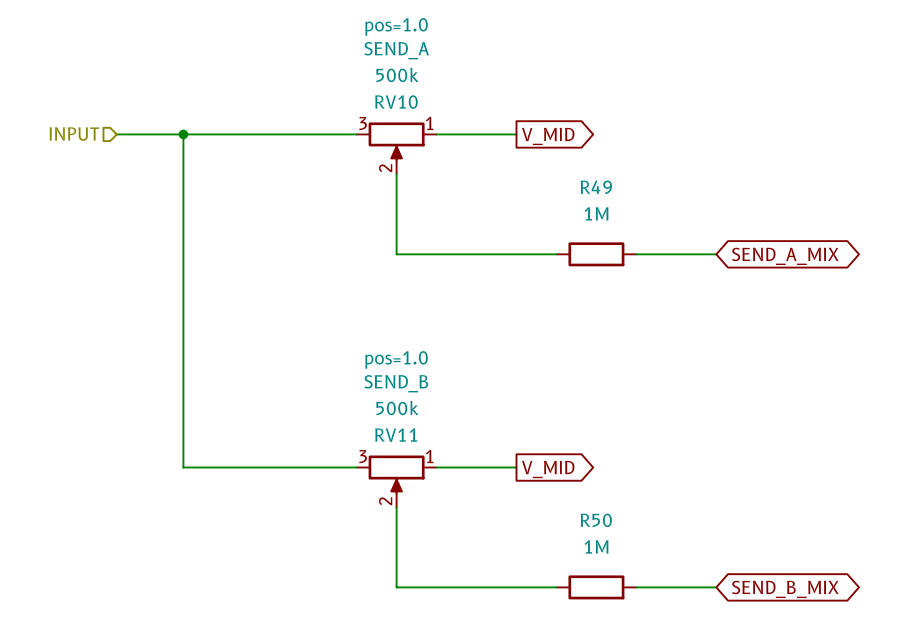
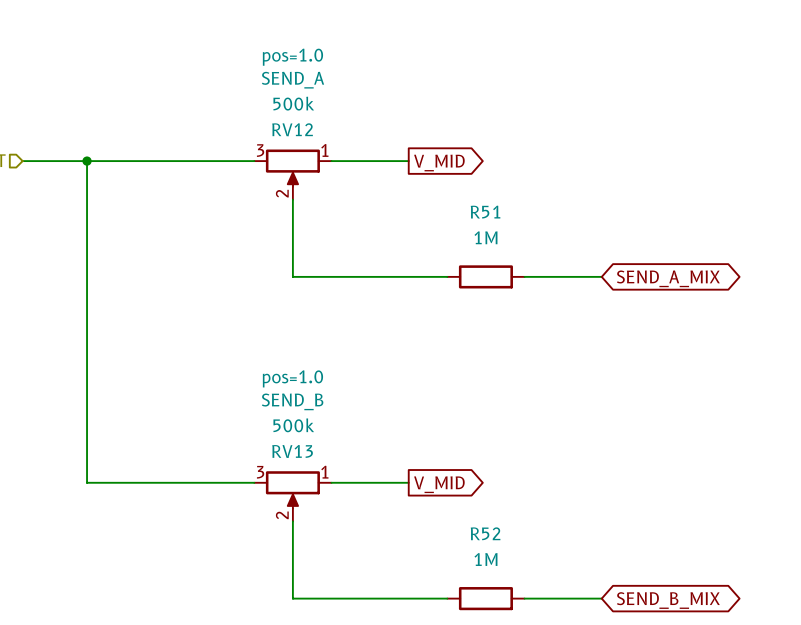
RV10 name: RV10 (396, 102) -> RV12 (292, 129)
R49 name: R49 (596, 187) -> R51 (485, 212)
RV11 name: RV11 (396, 435) -> RV13 (292, 451)
R50 name: R50 (596, 520) -> R52 (485, 533)

